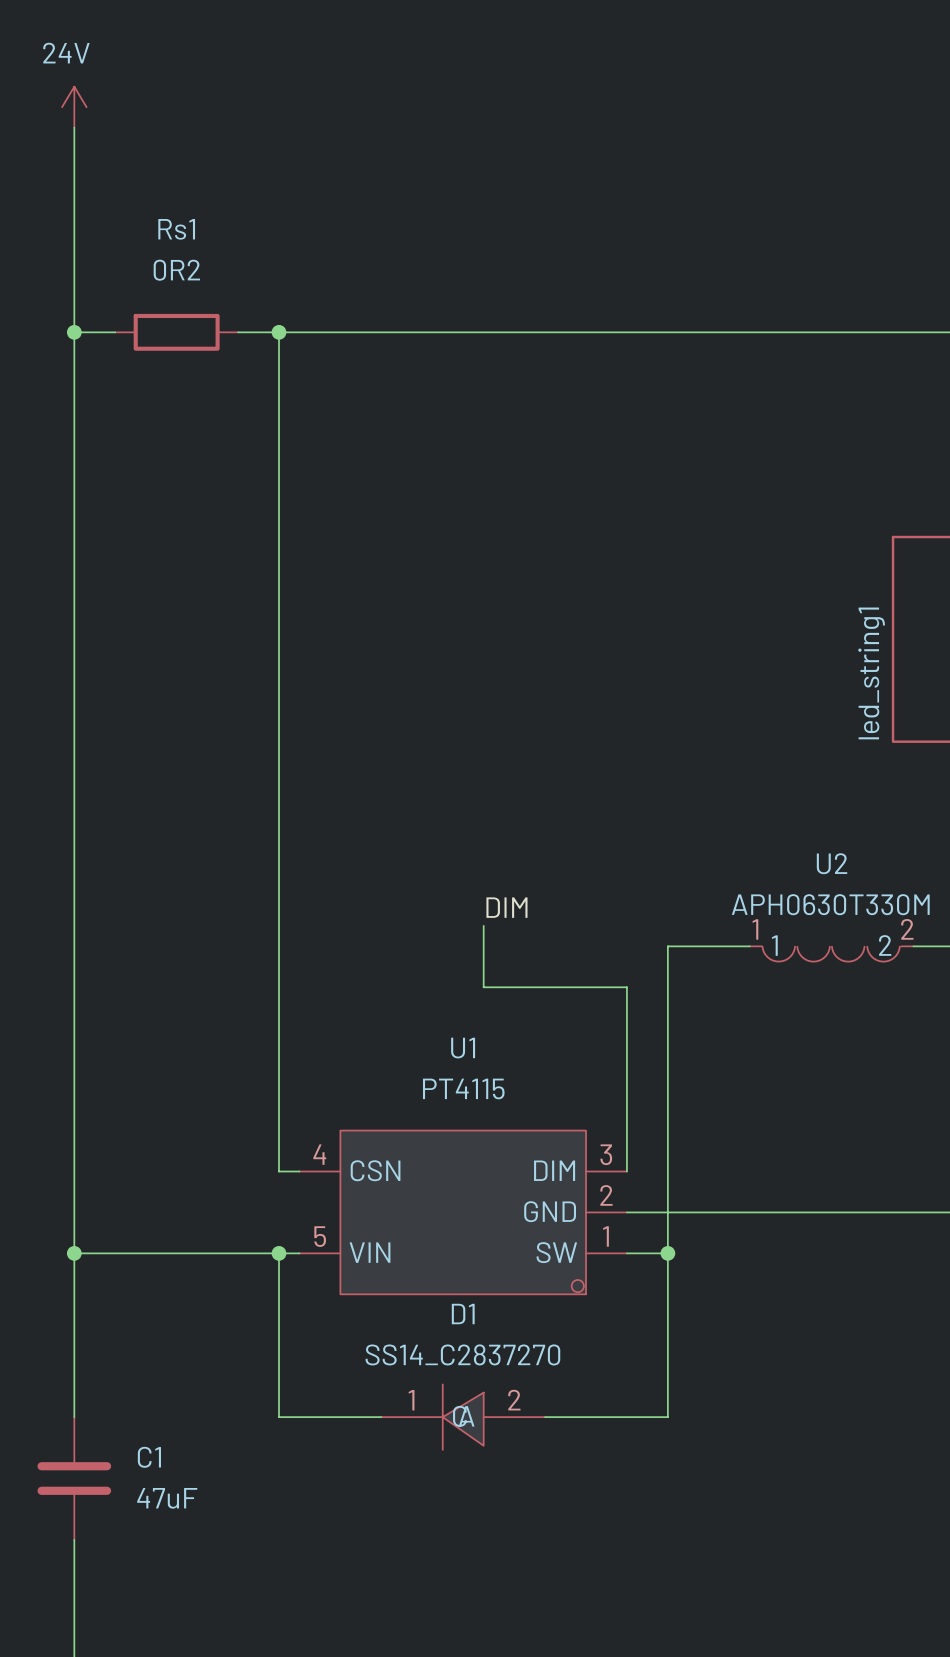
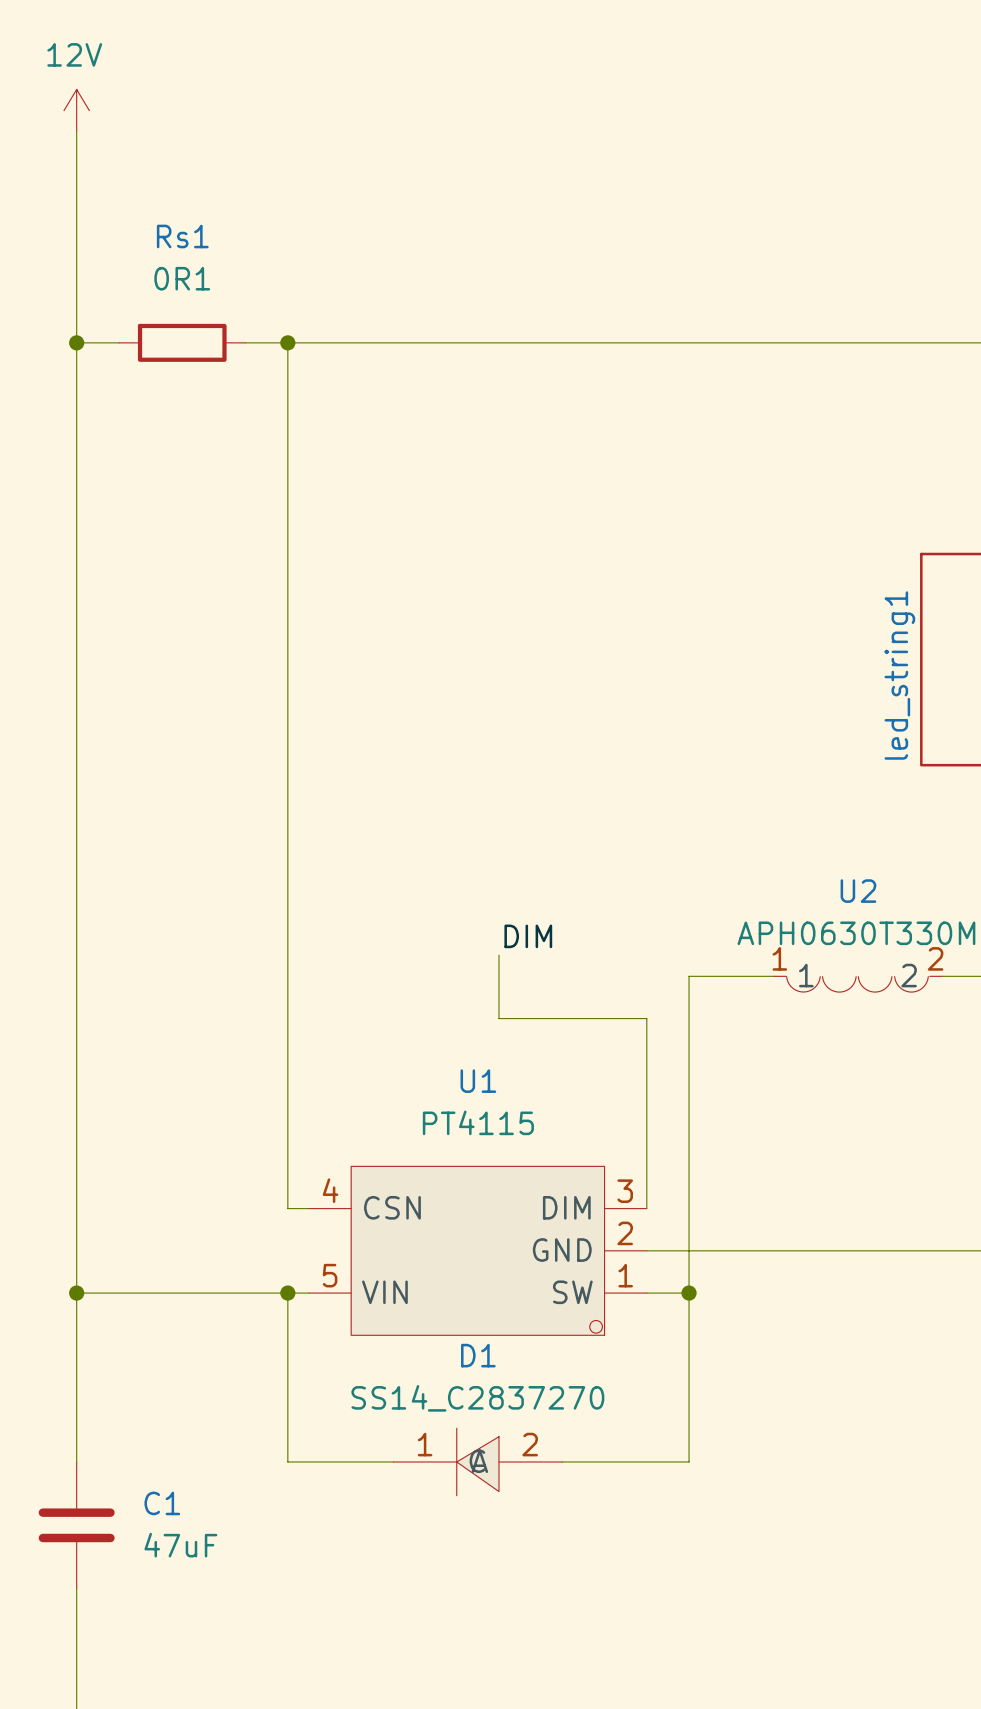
power symbol: 24V (74, 107) -> 12V (76, 110)
Rs1 value: 0R2 (176, 270) -> 0R1 (182, 278)

